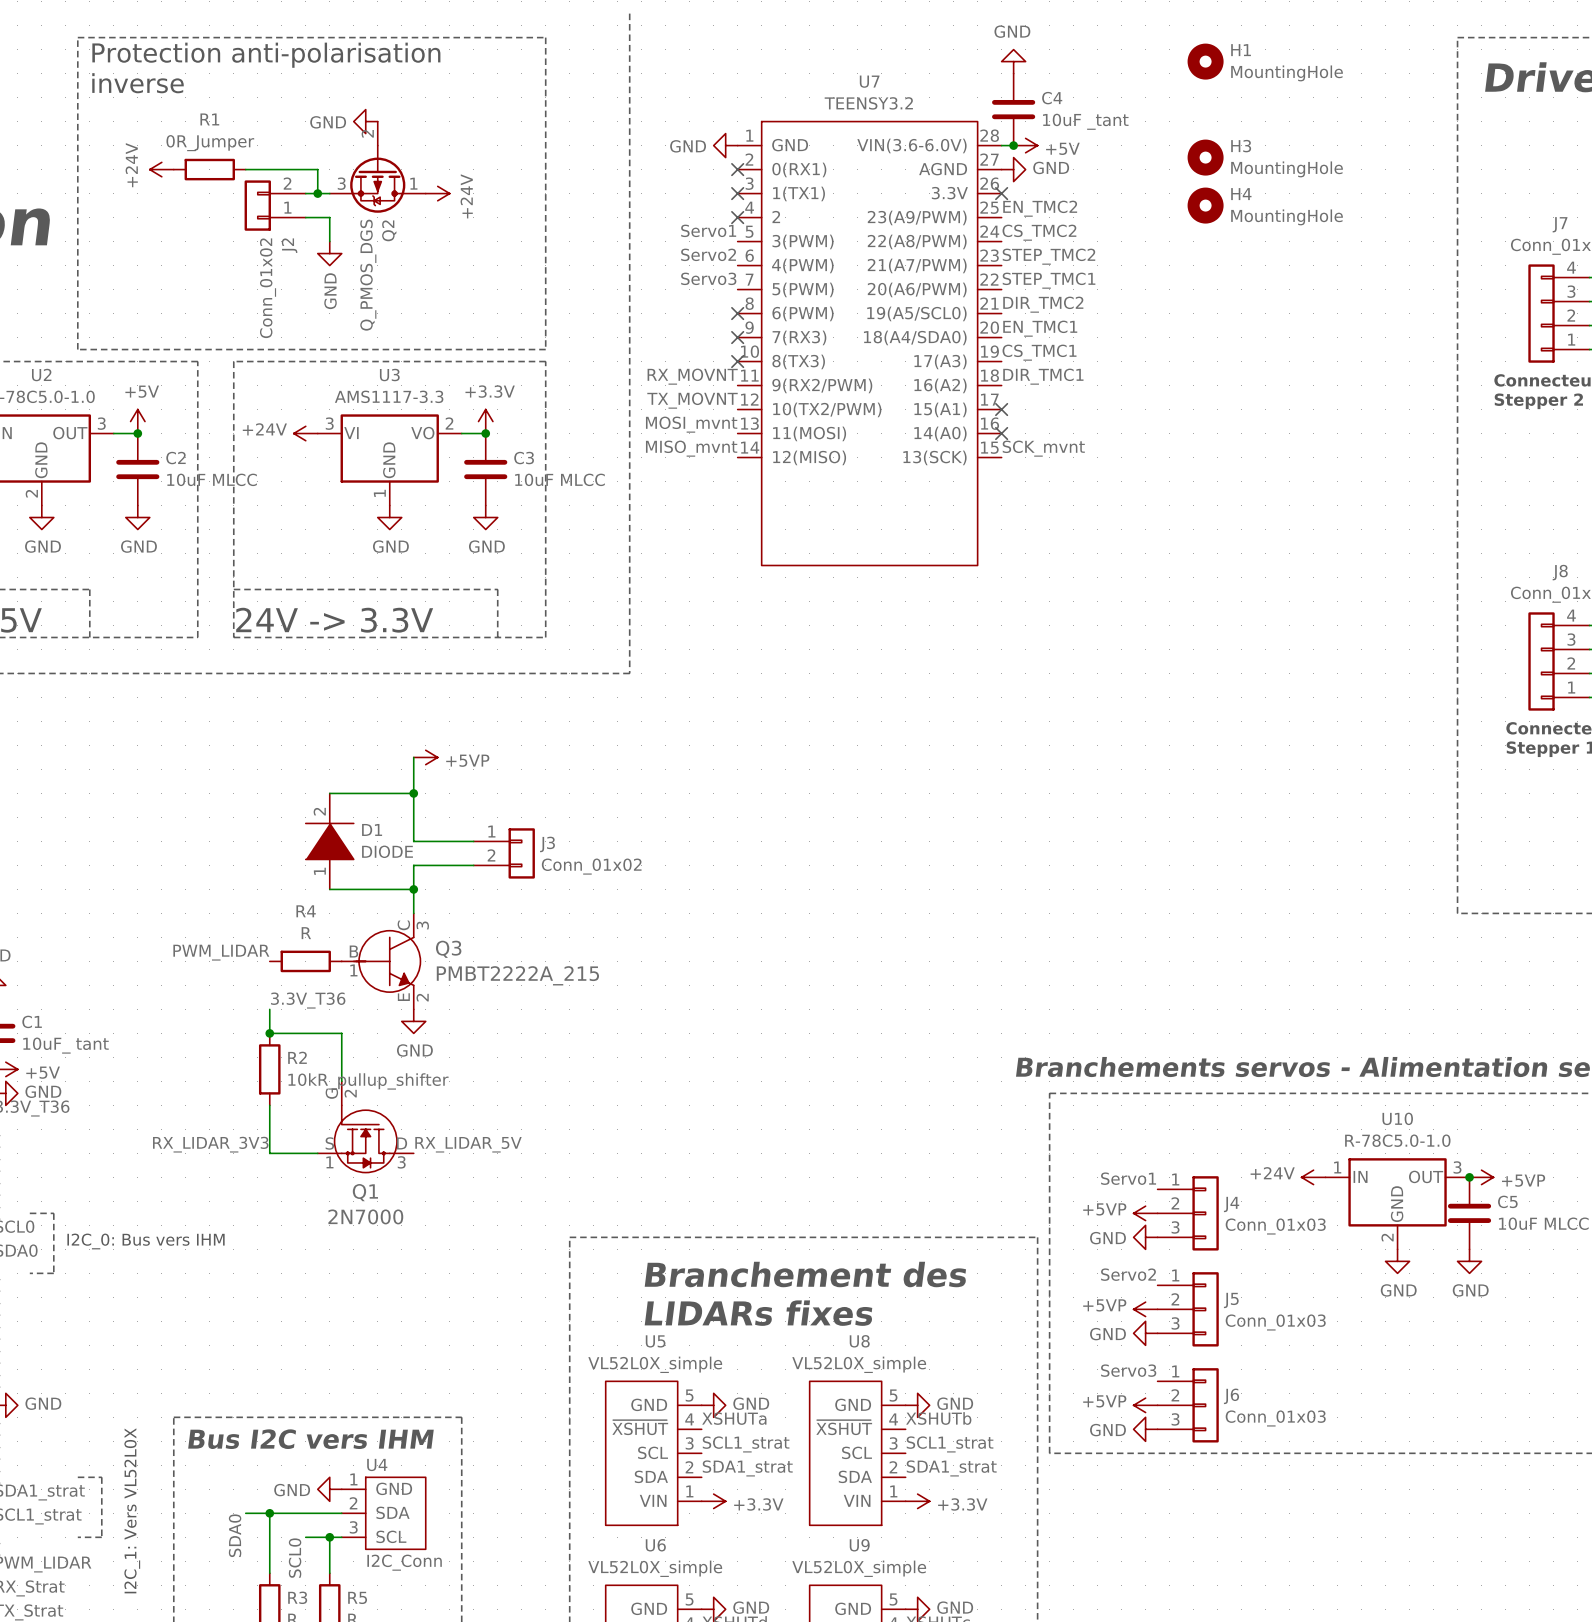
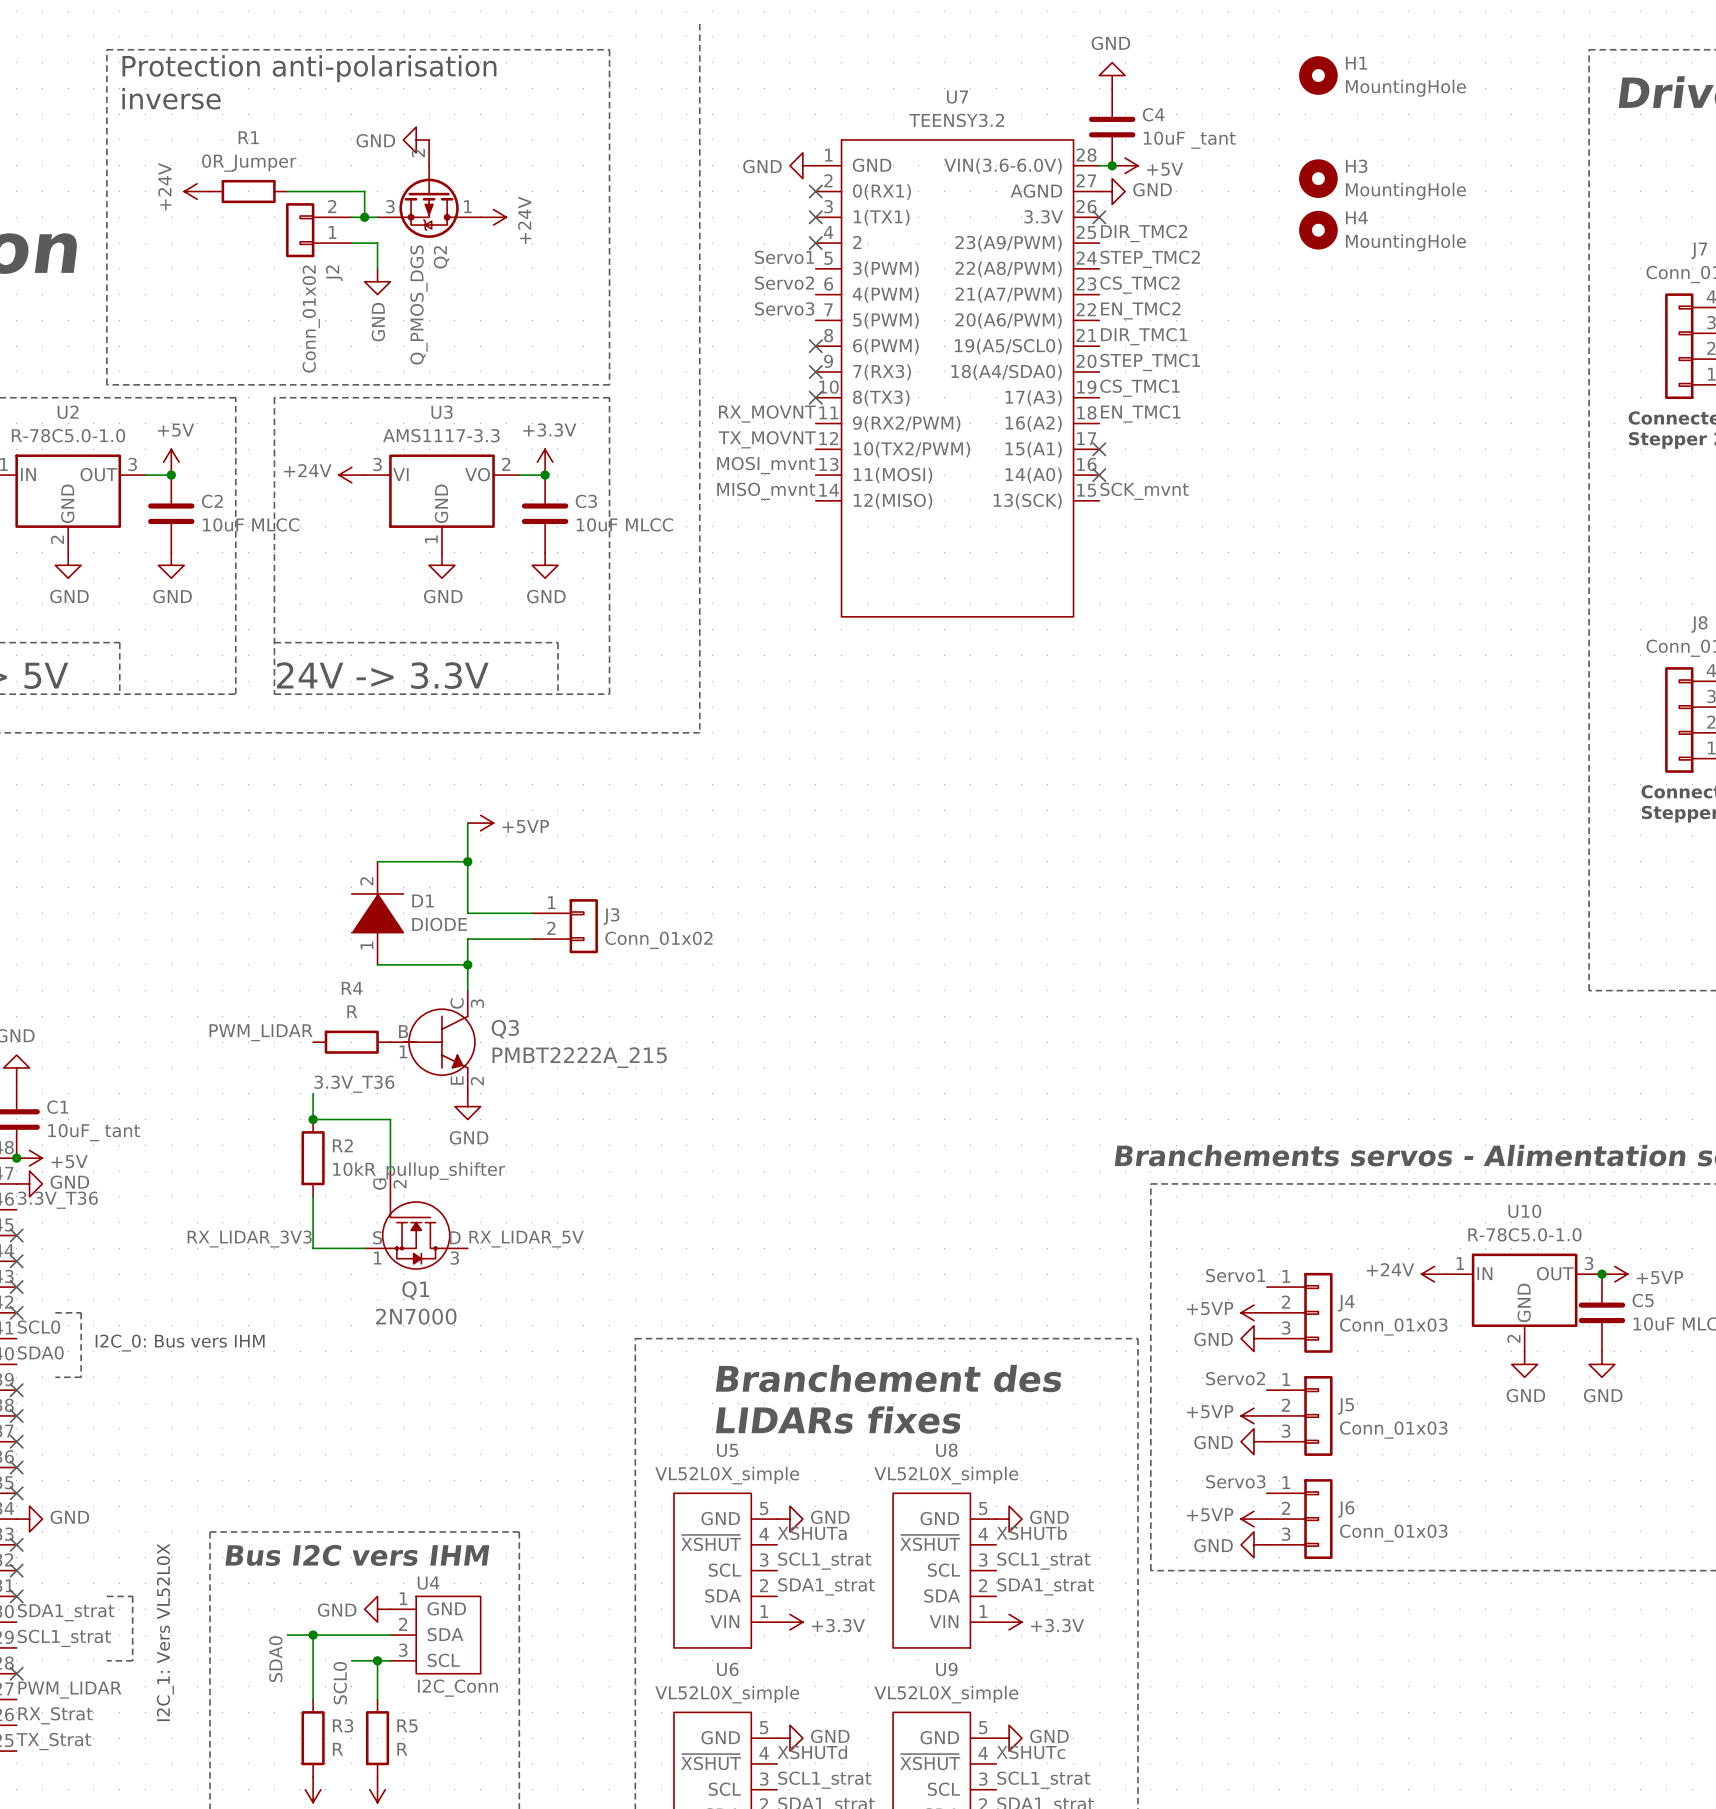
label: EN_TMC2 (1040, 208) -> DIR_TMC2 (1144, 233)
label: CS_TMC2 (1039, 232) -> STEP_TMC2 (1150, 259)
label: STEP_TMC2 (1048, 256) -> CS_TMC2 (1139, 285)
label: STEP_TMC1 (1049, 280) -> EN_TMC2 (1140, 310)
label: DIR_TMC2 (1043, 304) -> DIR_TMC1 (1144, 336)
label: EN_TMC1 (1040, 328) -> STEP_TMC1 (1150, 362)
label: DIR_TMC1 (1043, 376) -> EN_TMC1 (1140, 413)

